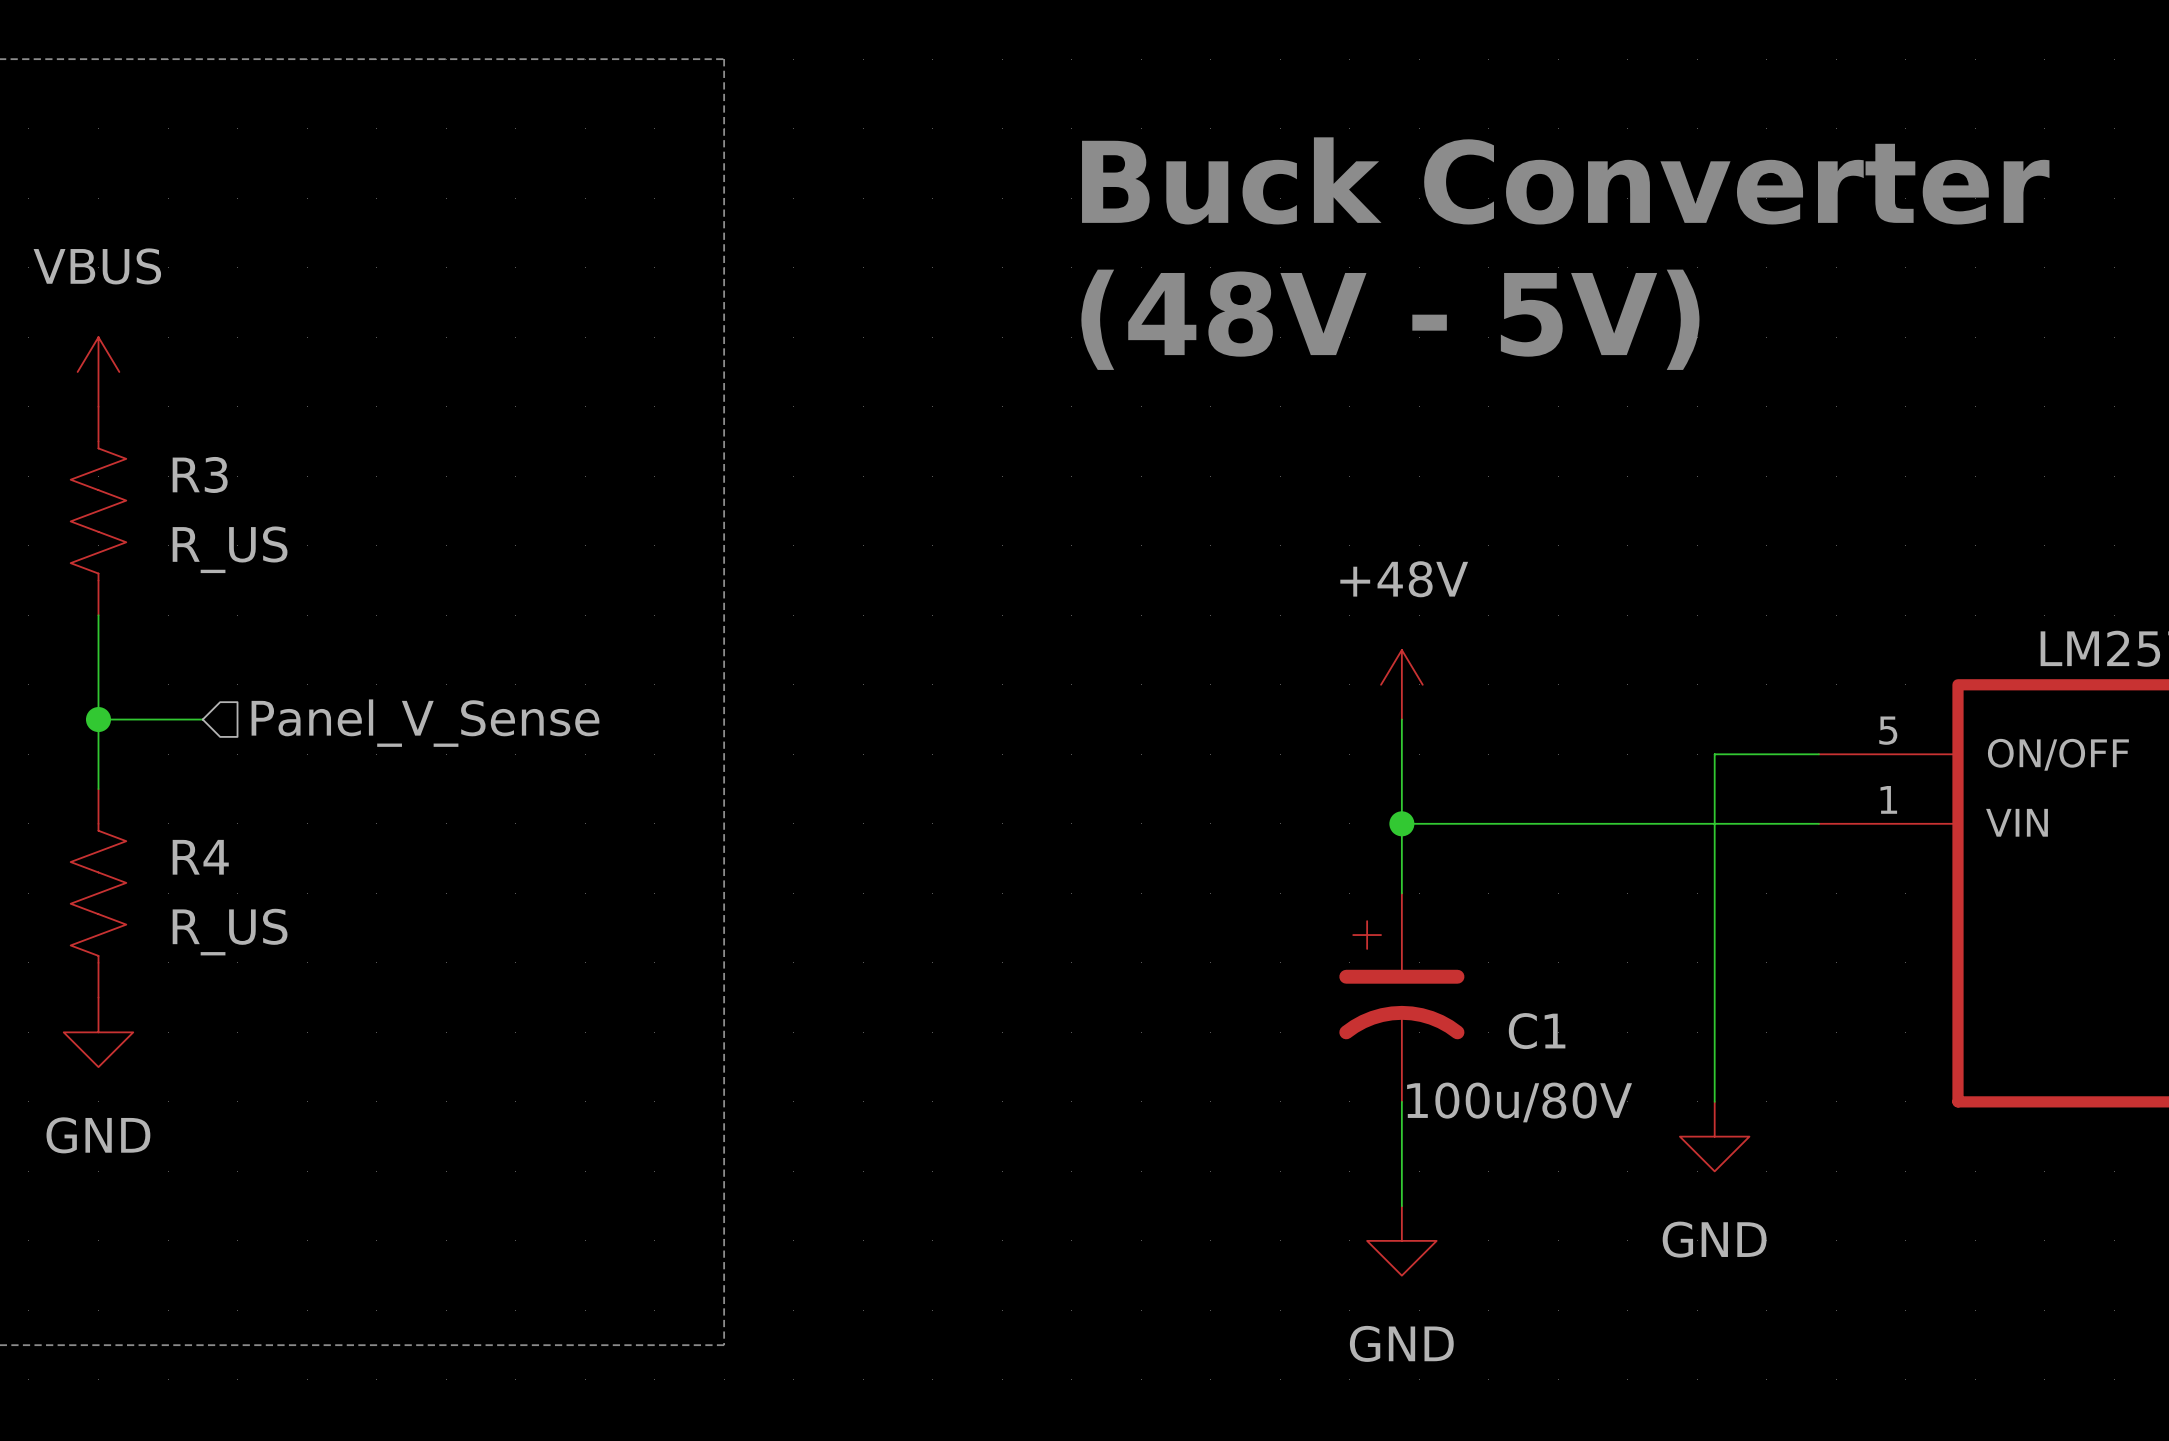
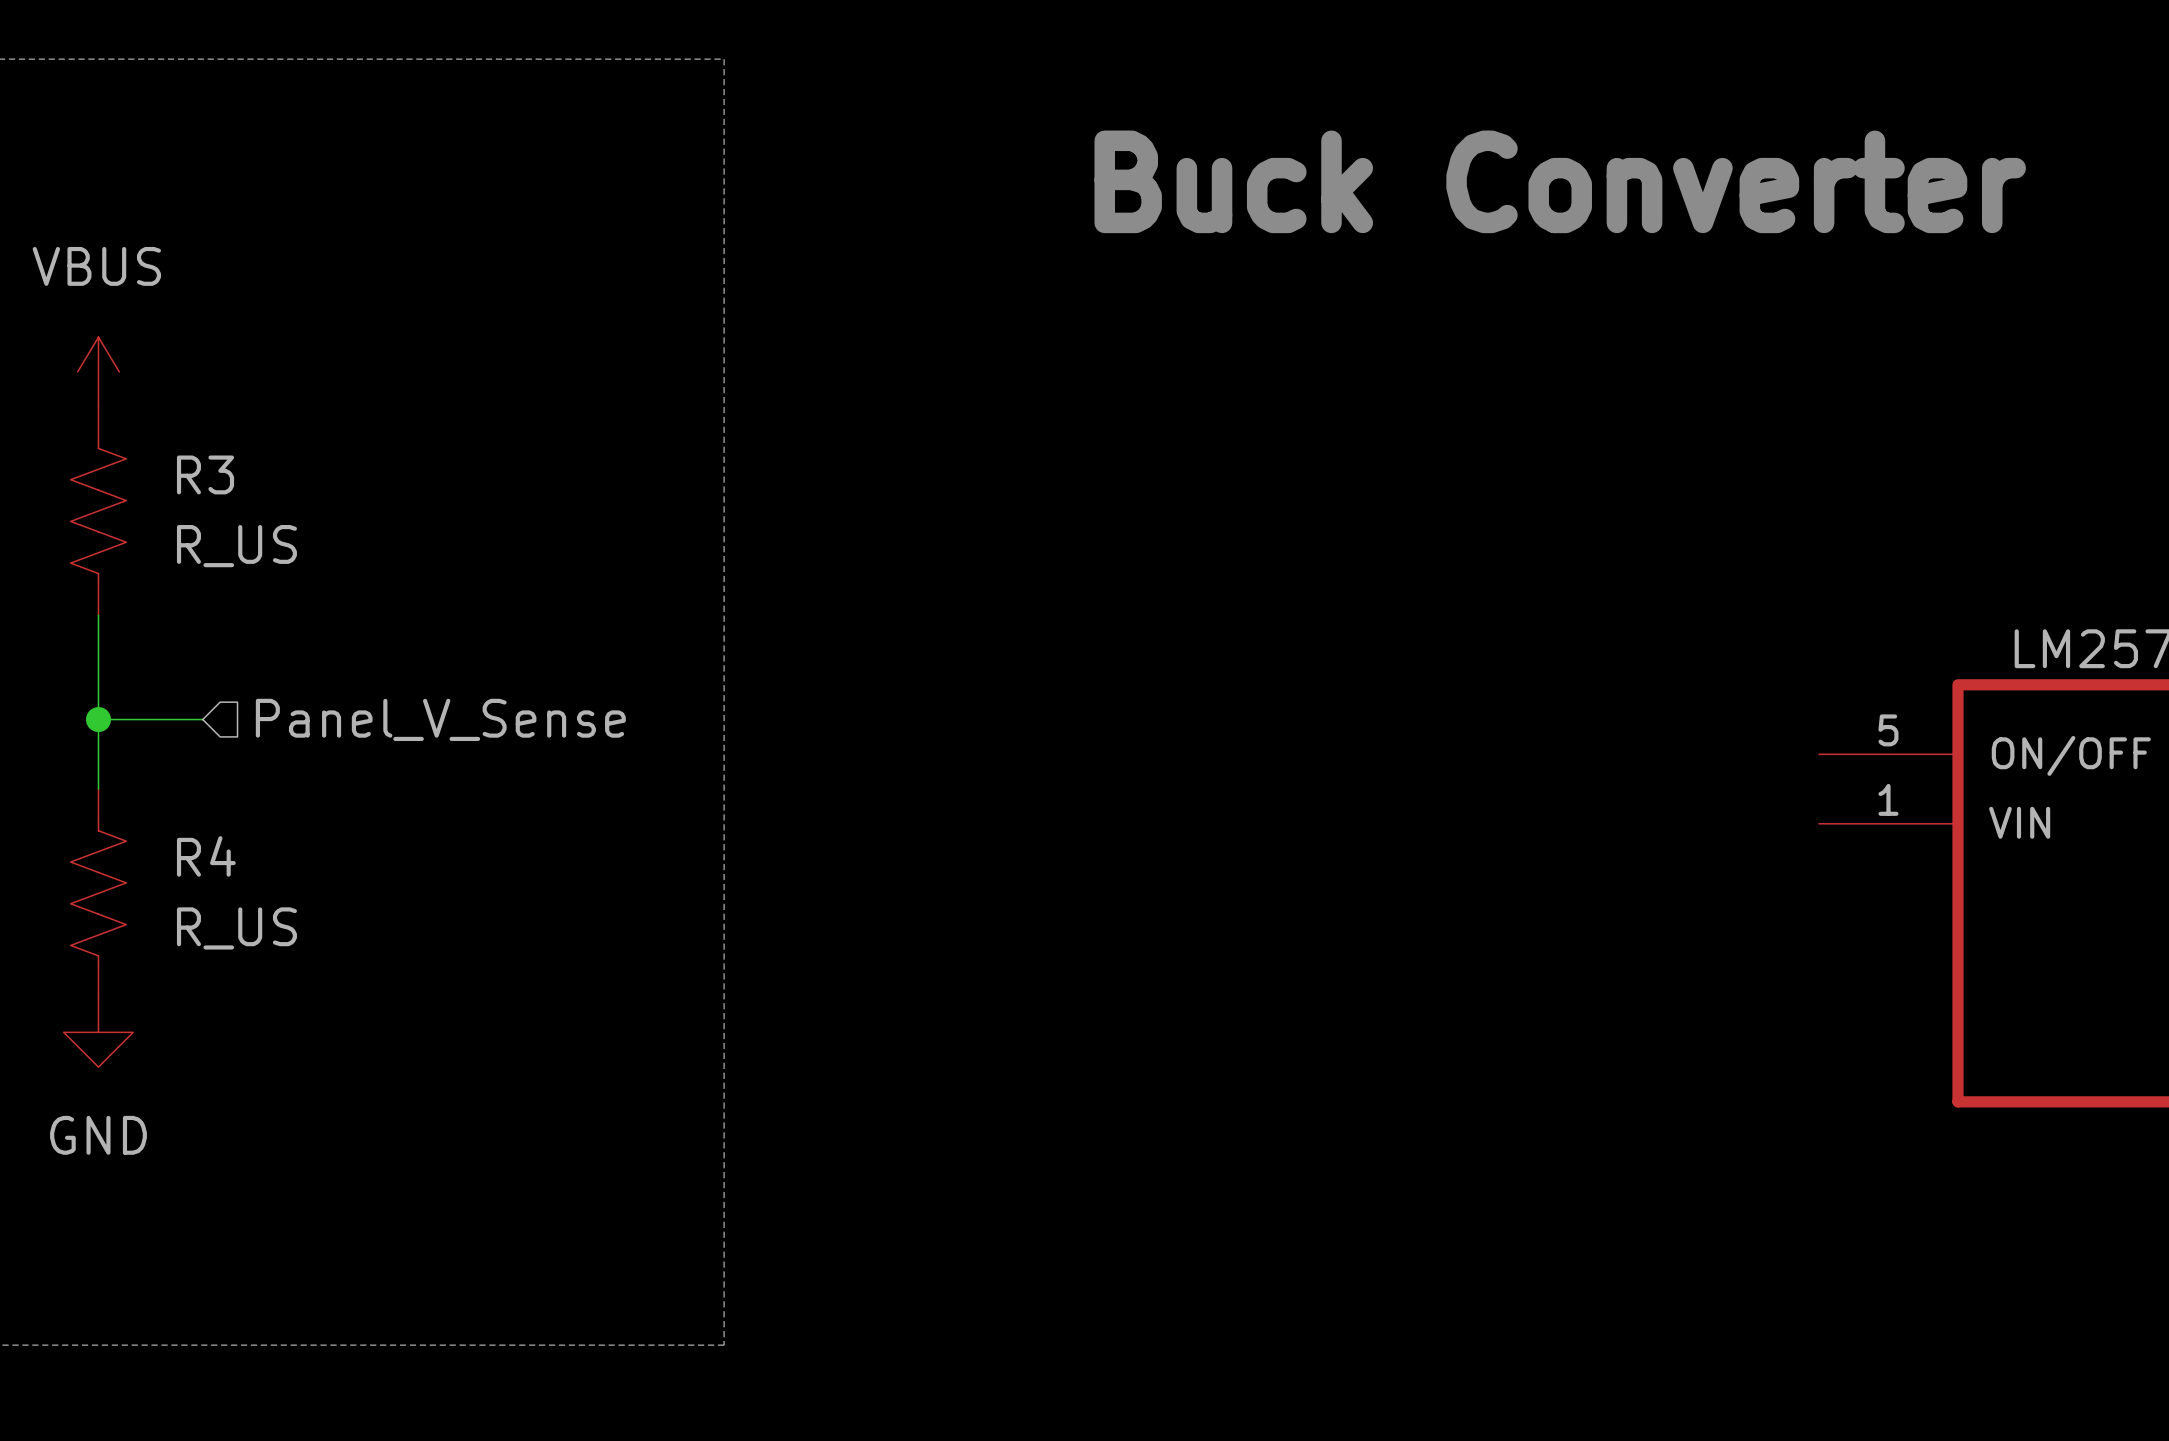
text: (48V - 5V) (1390, 319) -> none
power symbol: +48V (1401, 684) -> none
wire: (1401, 719) (1401, 893) -> none
wire: (1818, 754) (1714, 754) (1714, 1101) -> none
wire: (1401, 823) (1818, 823) -> none
junction: (1401, 823) -> none
C1: 100u/80V (1401, 997) -> none
wire: (1401, 1101) (1401, 1206) -> none
power symbol: GND (1714, 1136) -> none
power symbol: GND (1401, 1240) -> none

